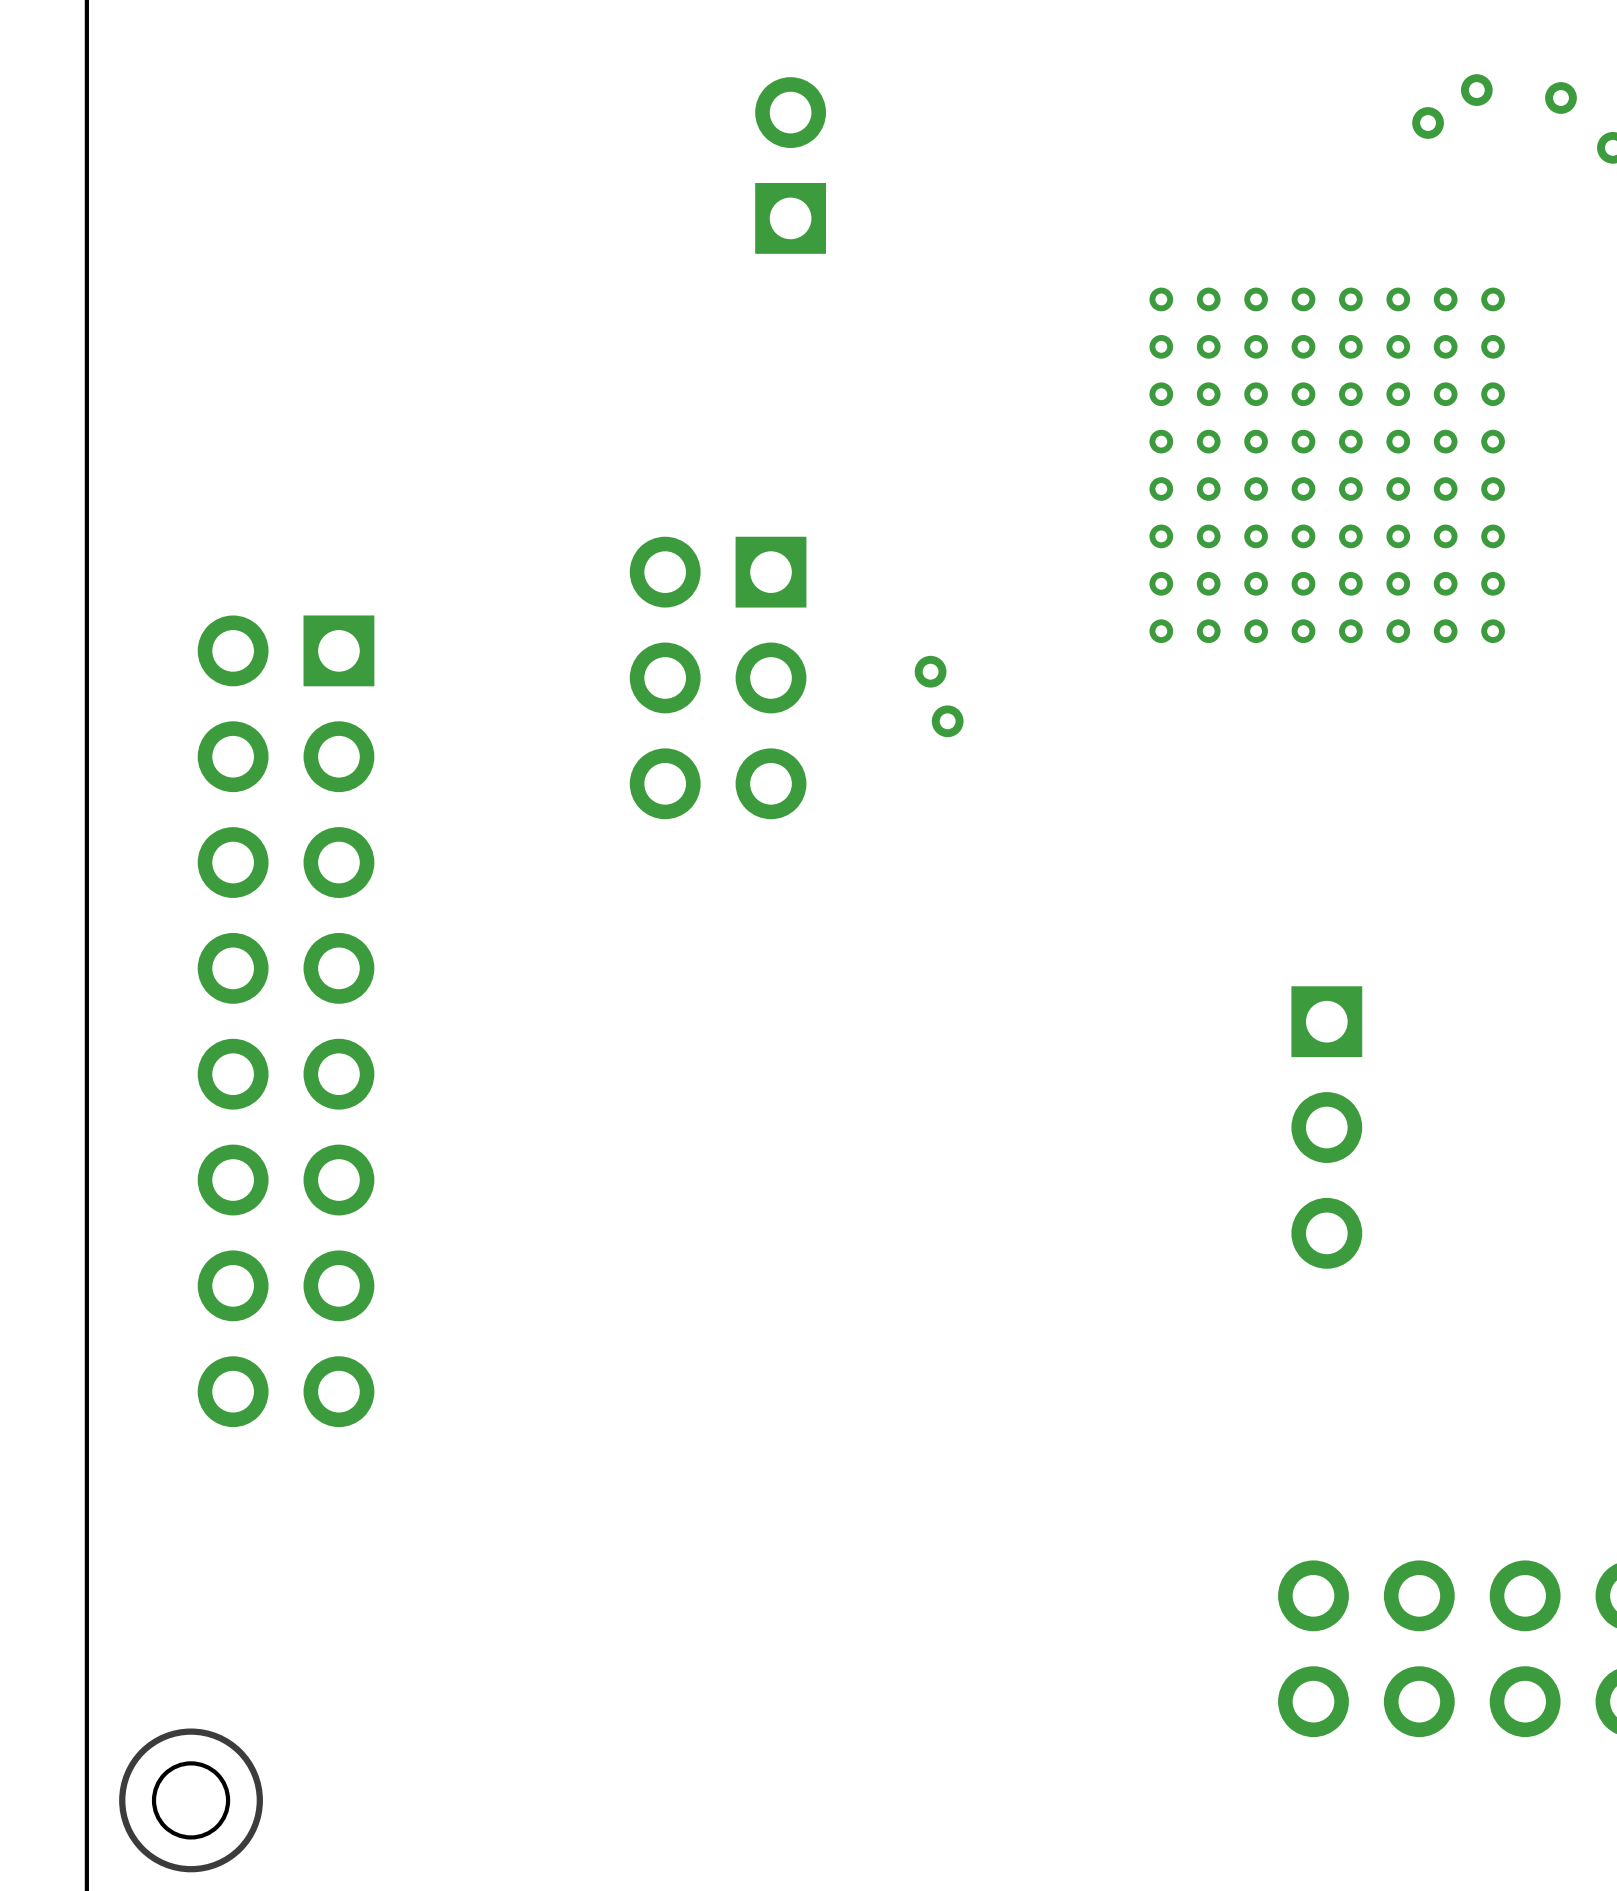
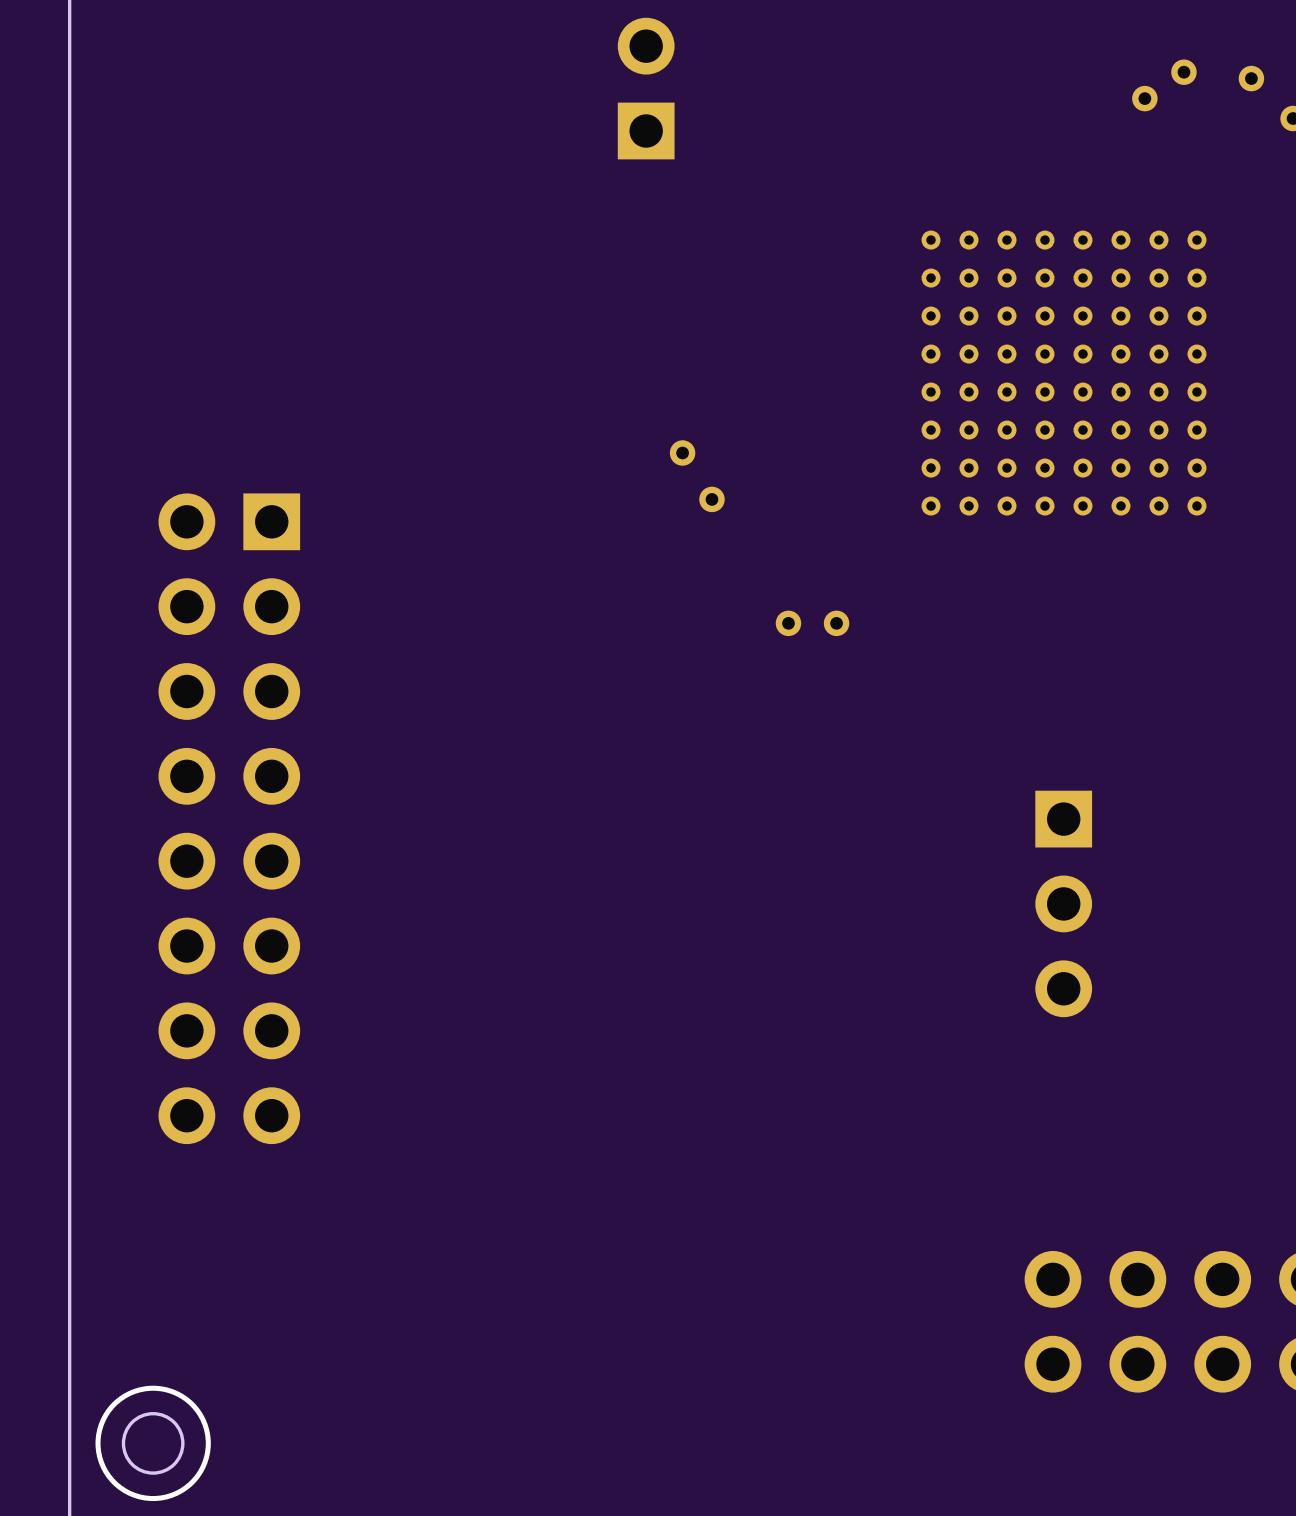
part position: (790, 165) -> (646, 88)
part: none -> (682, 453)
part: none -> (711, 499)
part: (930, 671) -> none
part: (718, 677) -> none
part: (947, 721) -> none
part: none -> (788, 623)
part: none -> (836, 623)

